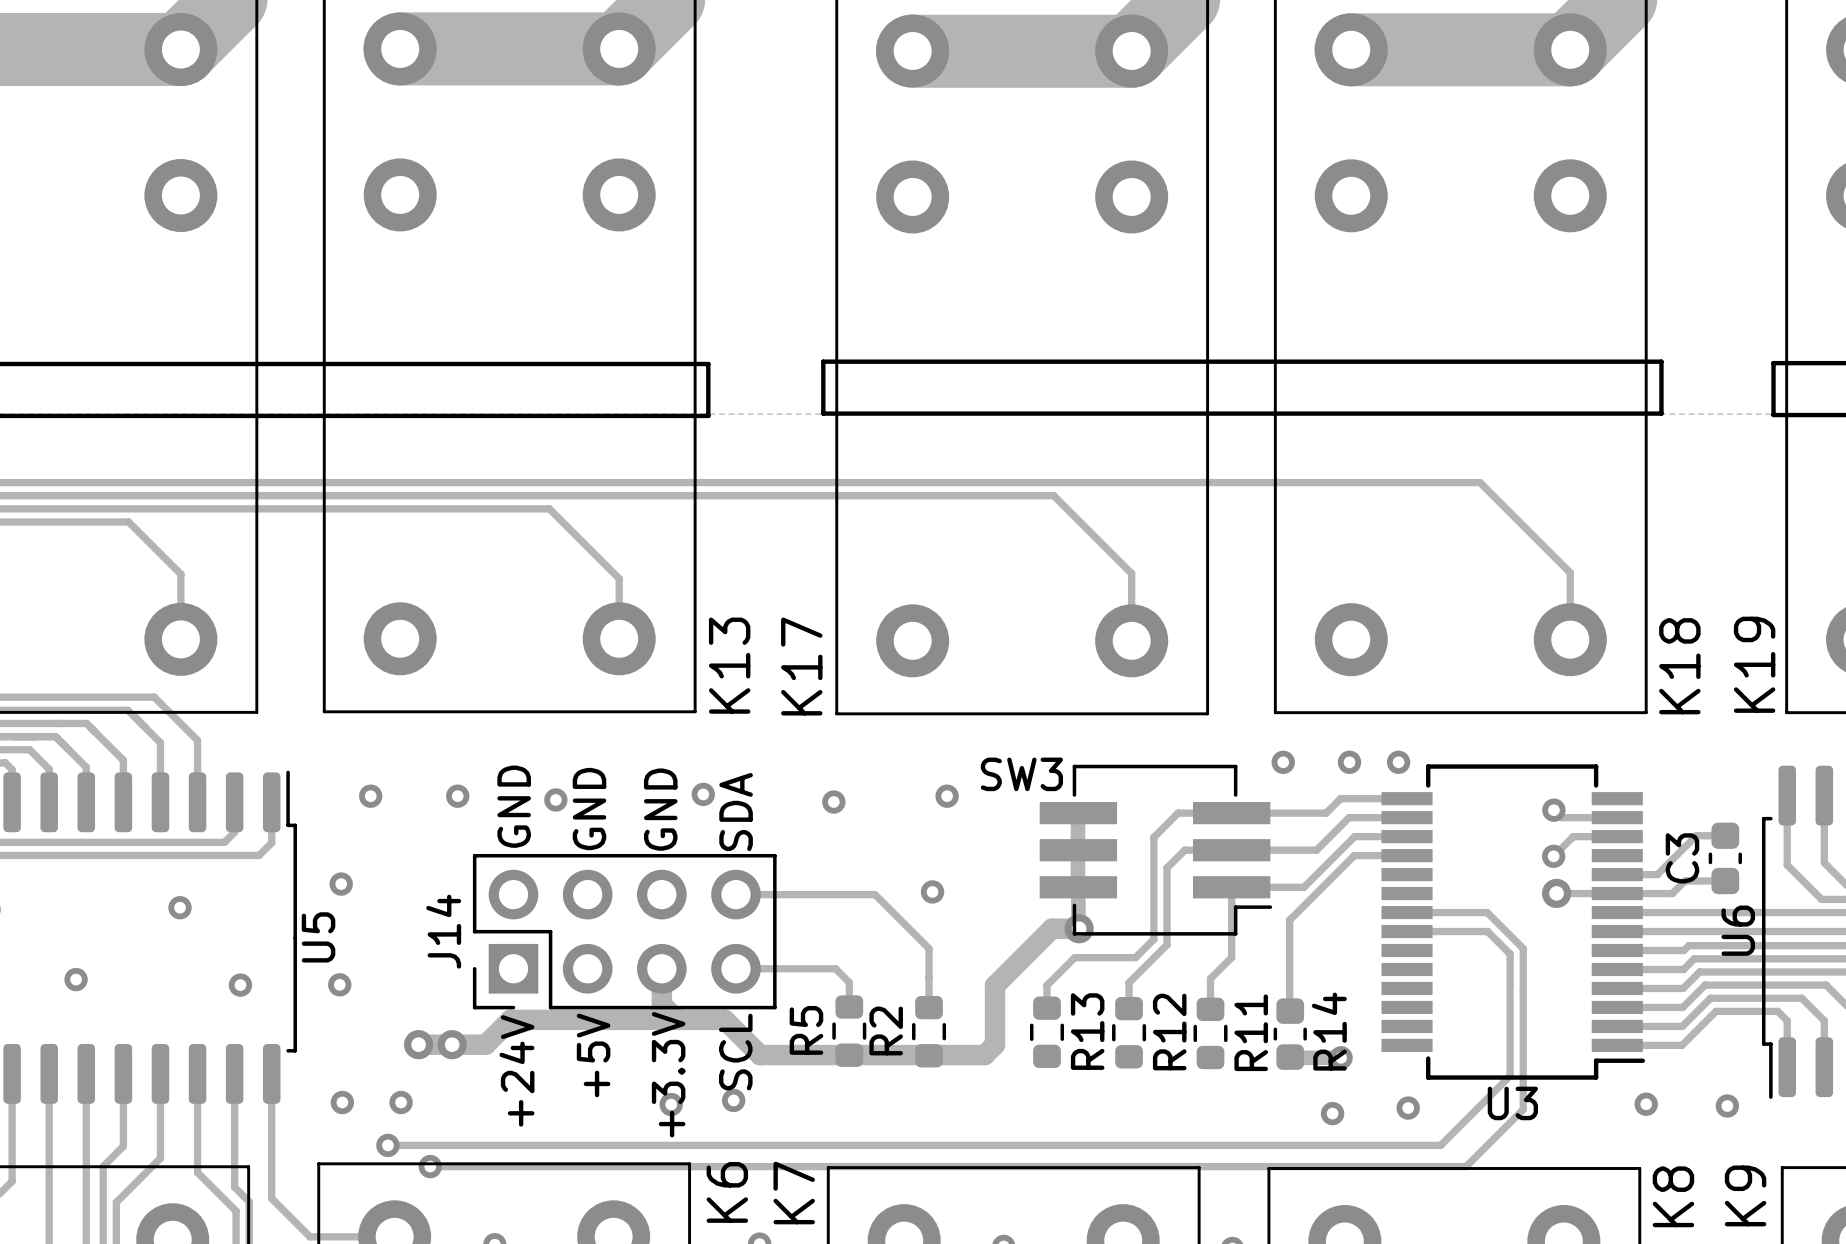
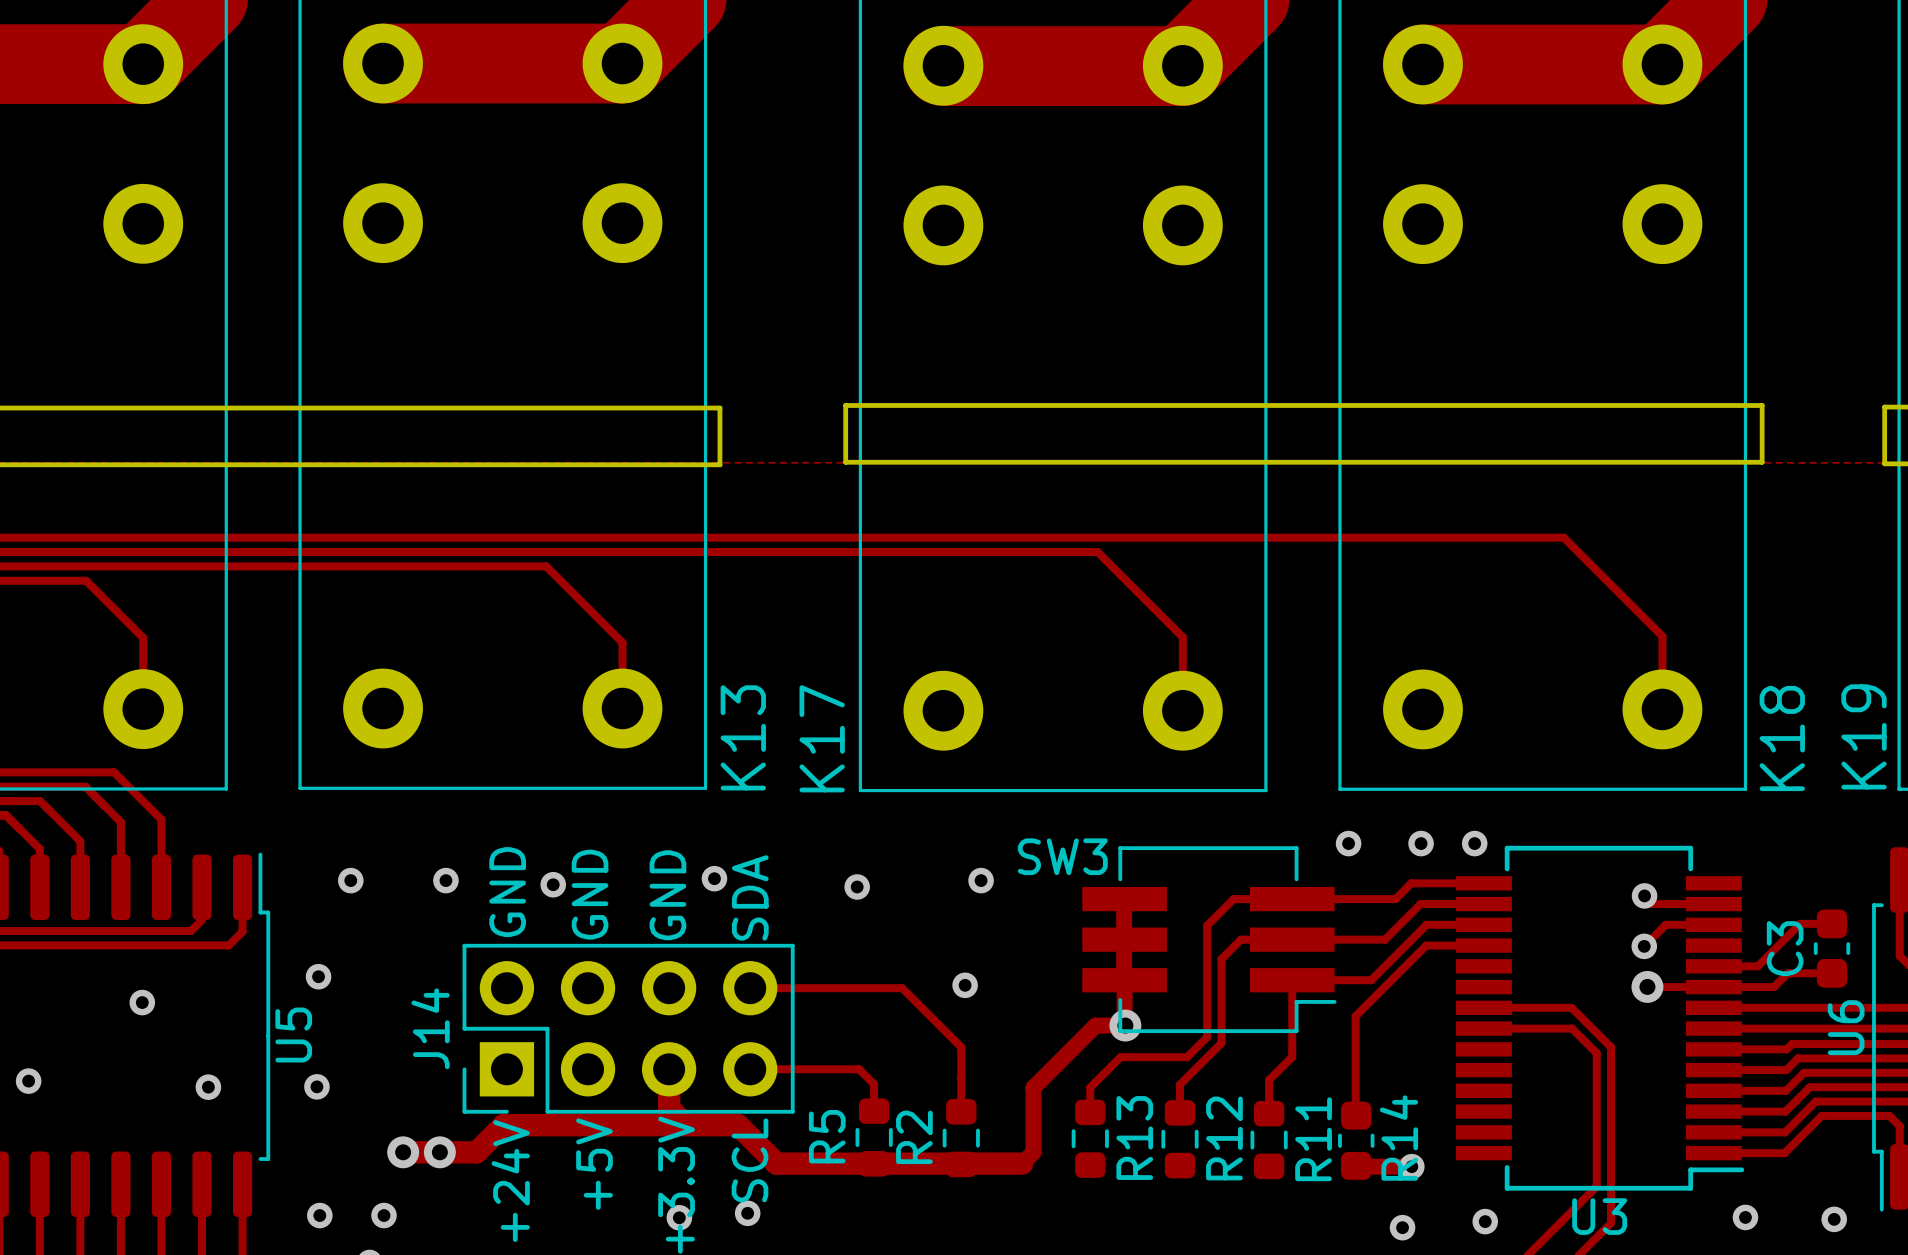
track width: thick (1079, 928) (1051, 928) (995, 985) (995, 1044) (984, 1055) -> thin (1125, 1025) (1095, 1025) (1033, 1087) (1033, 1152) (1022, 1163)

